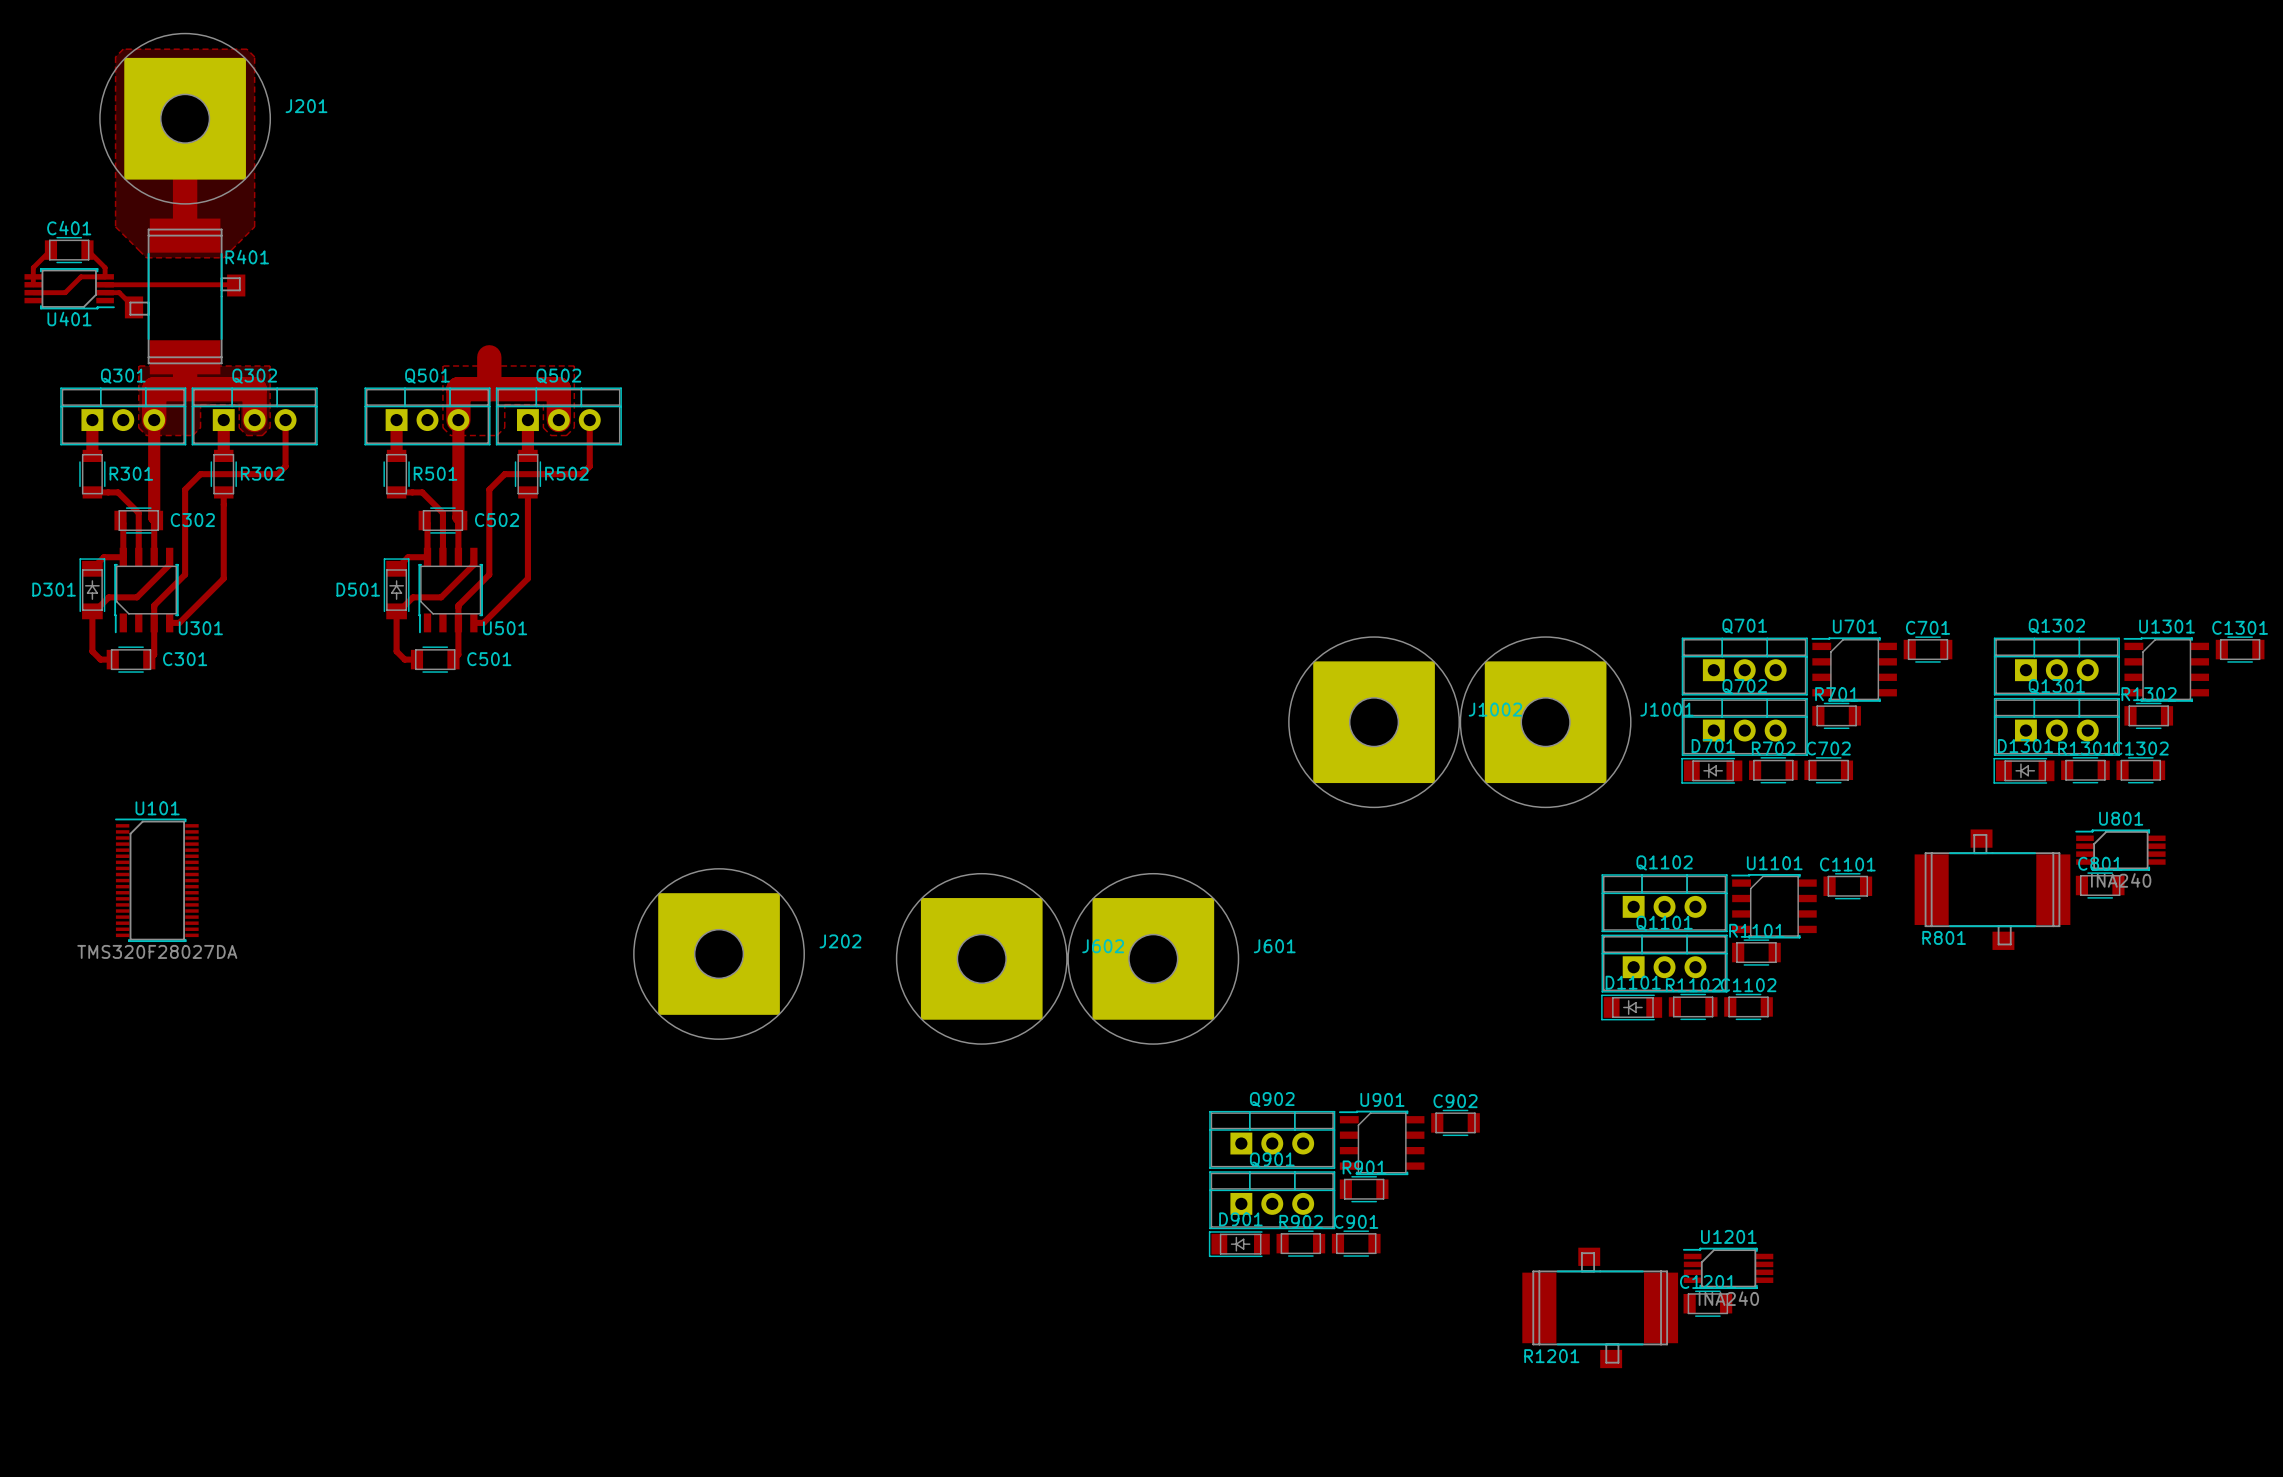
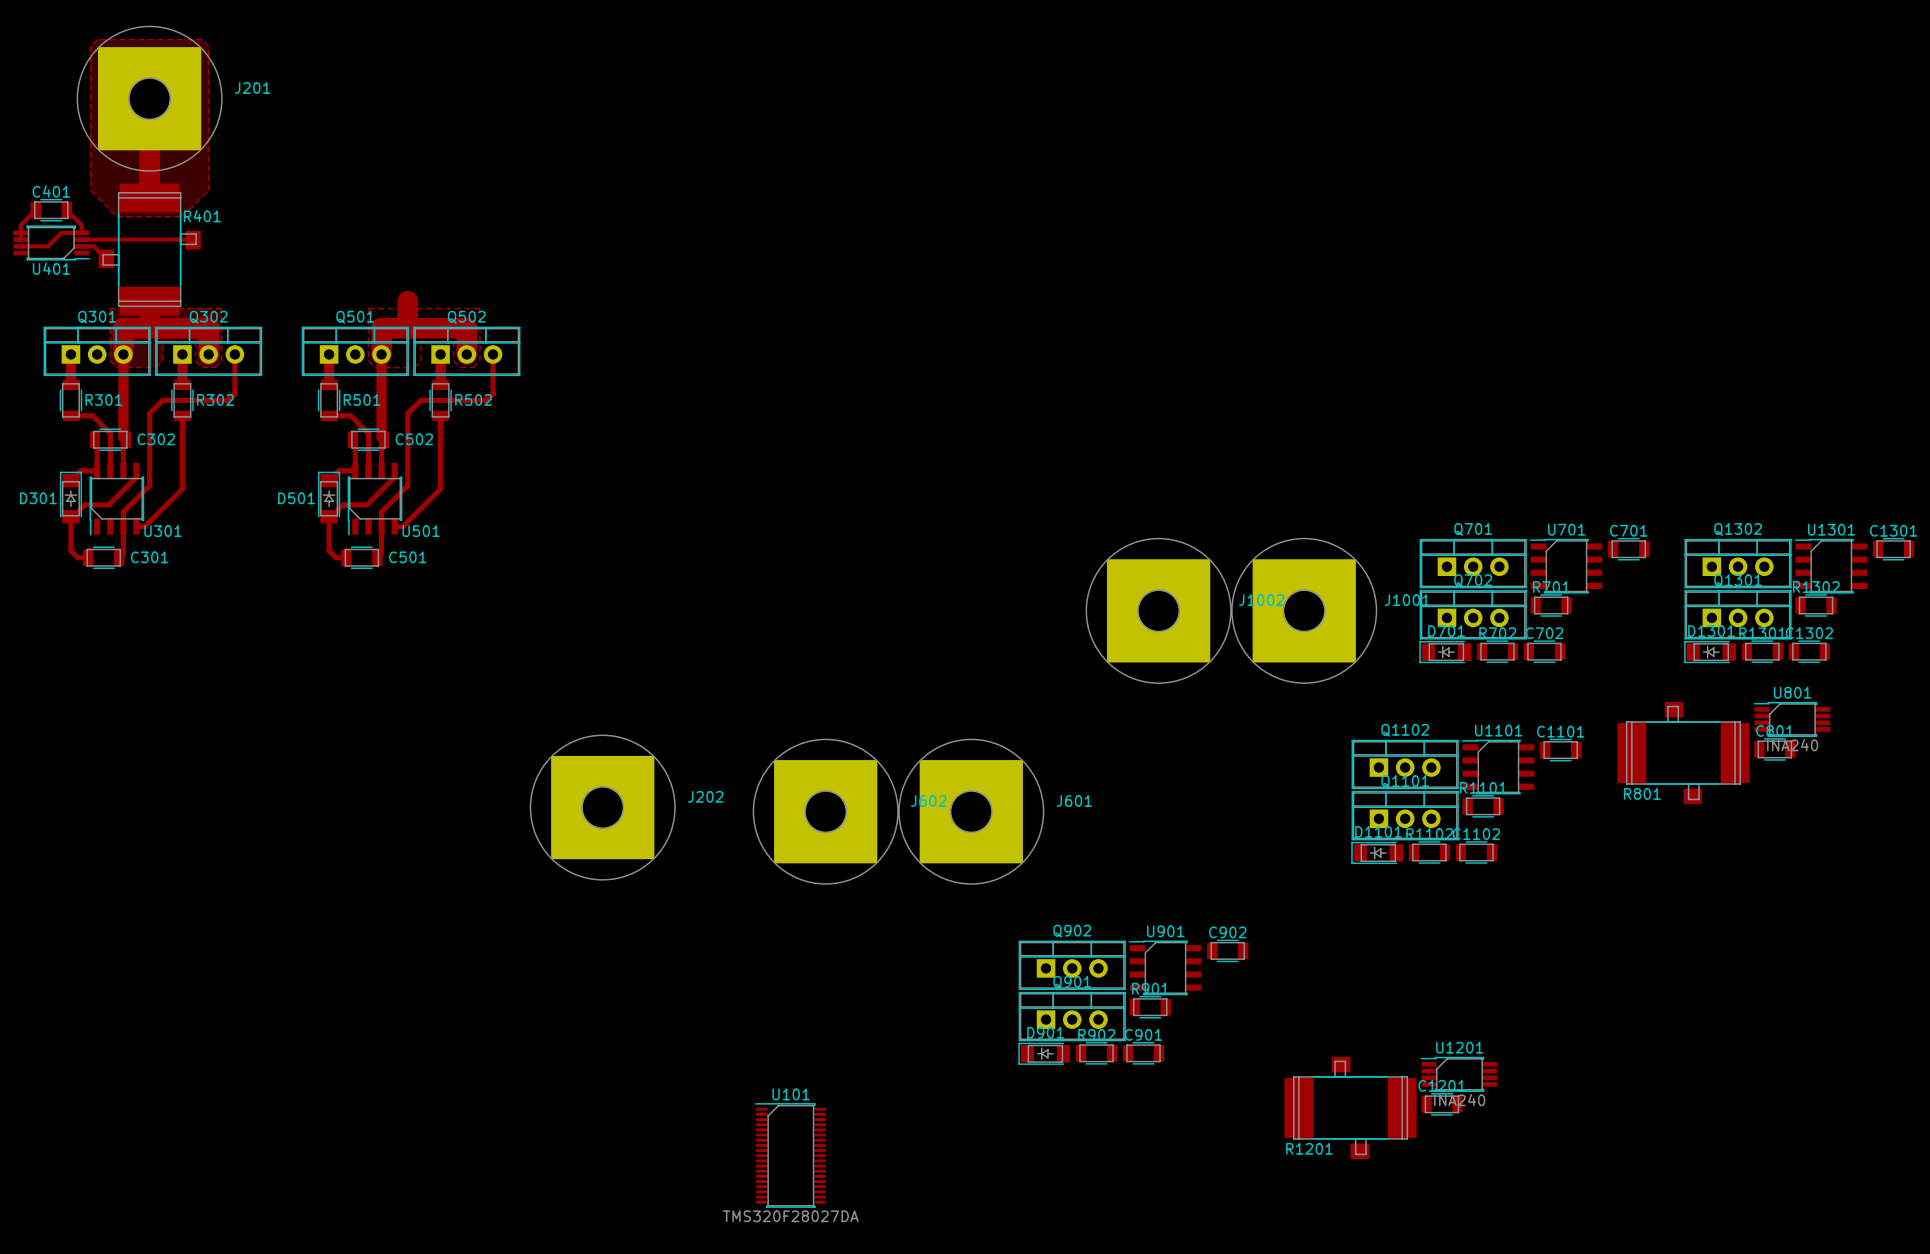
U101 position: (156, 880) -> (790, 1155)

